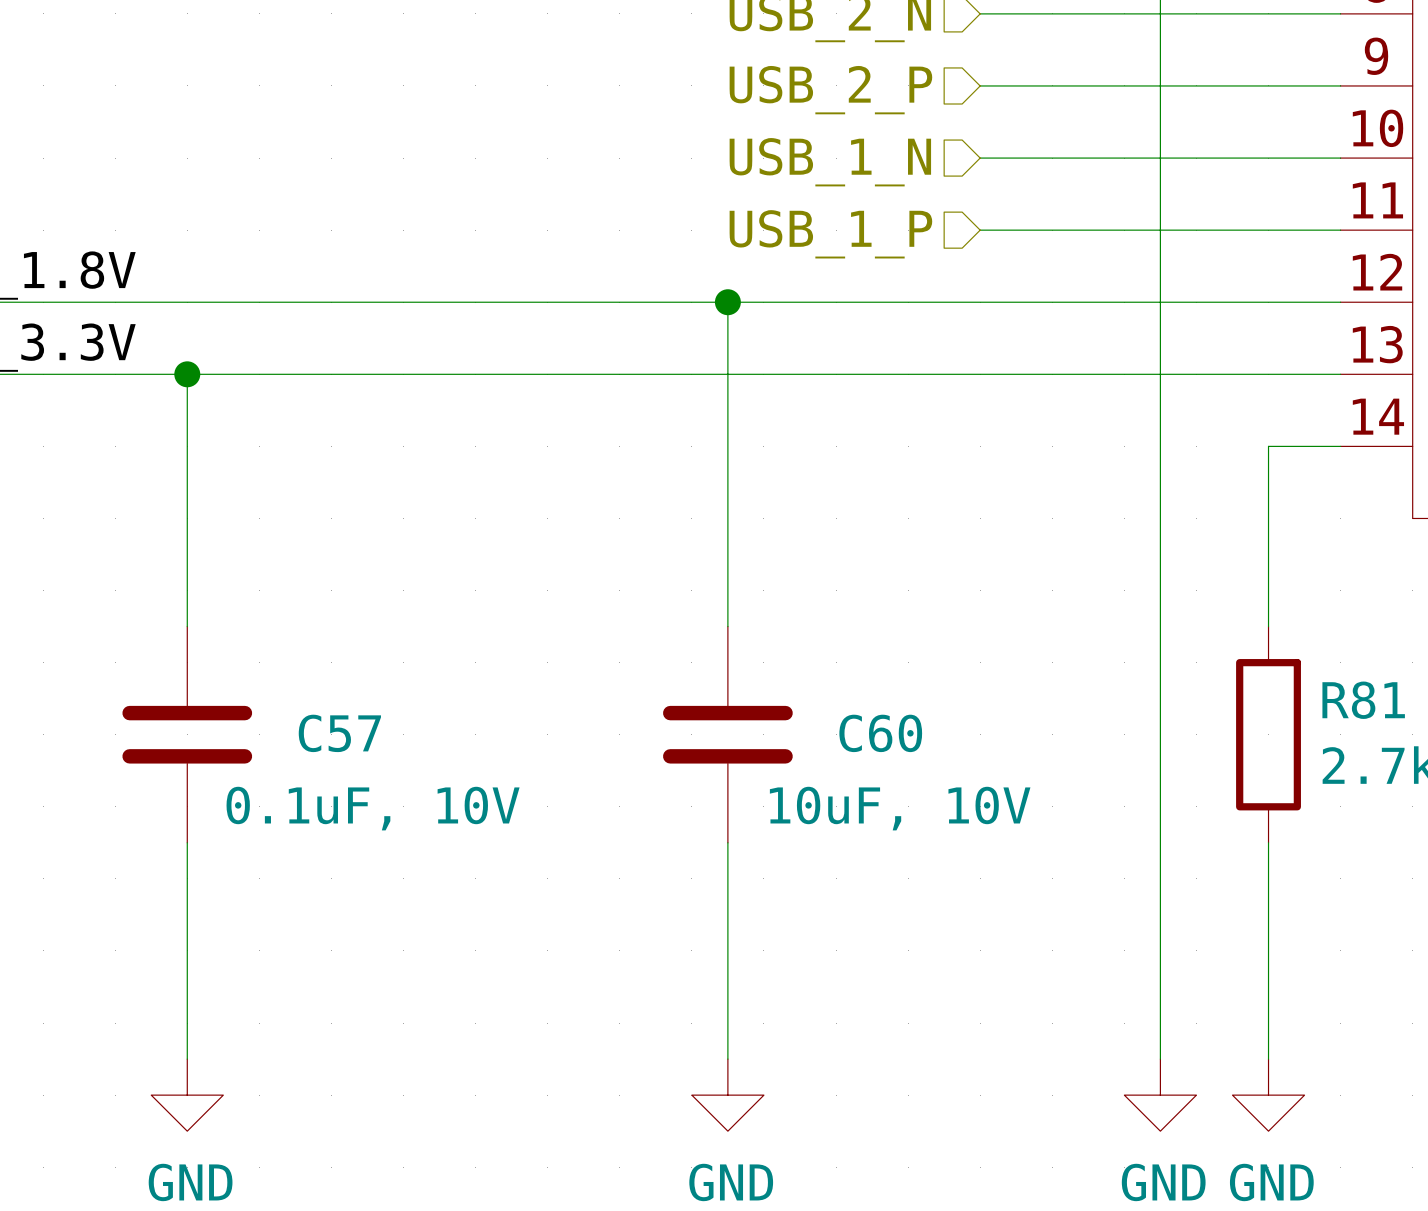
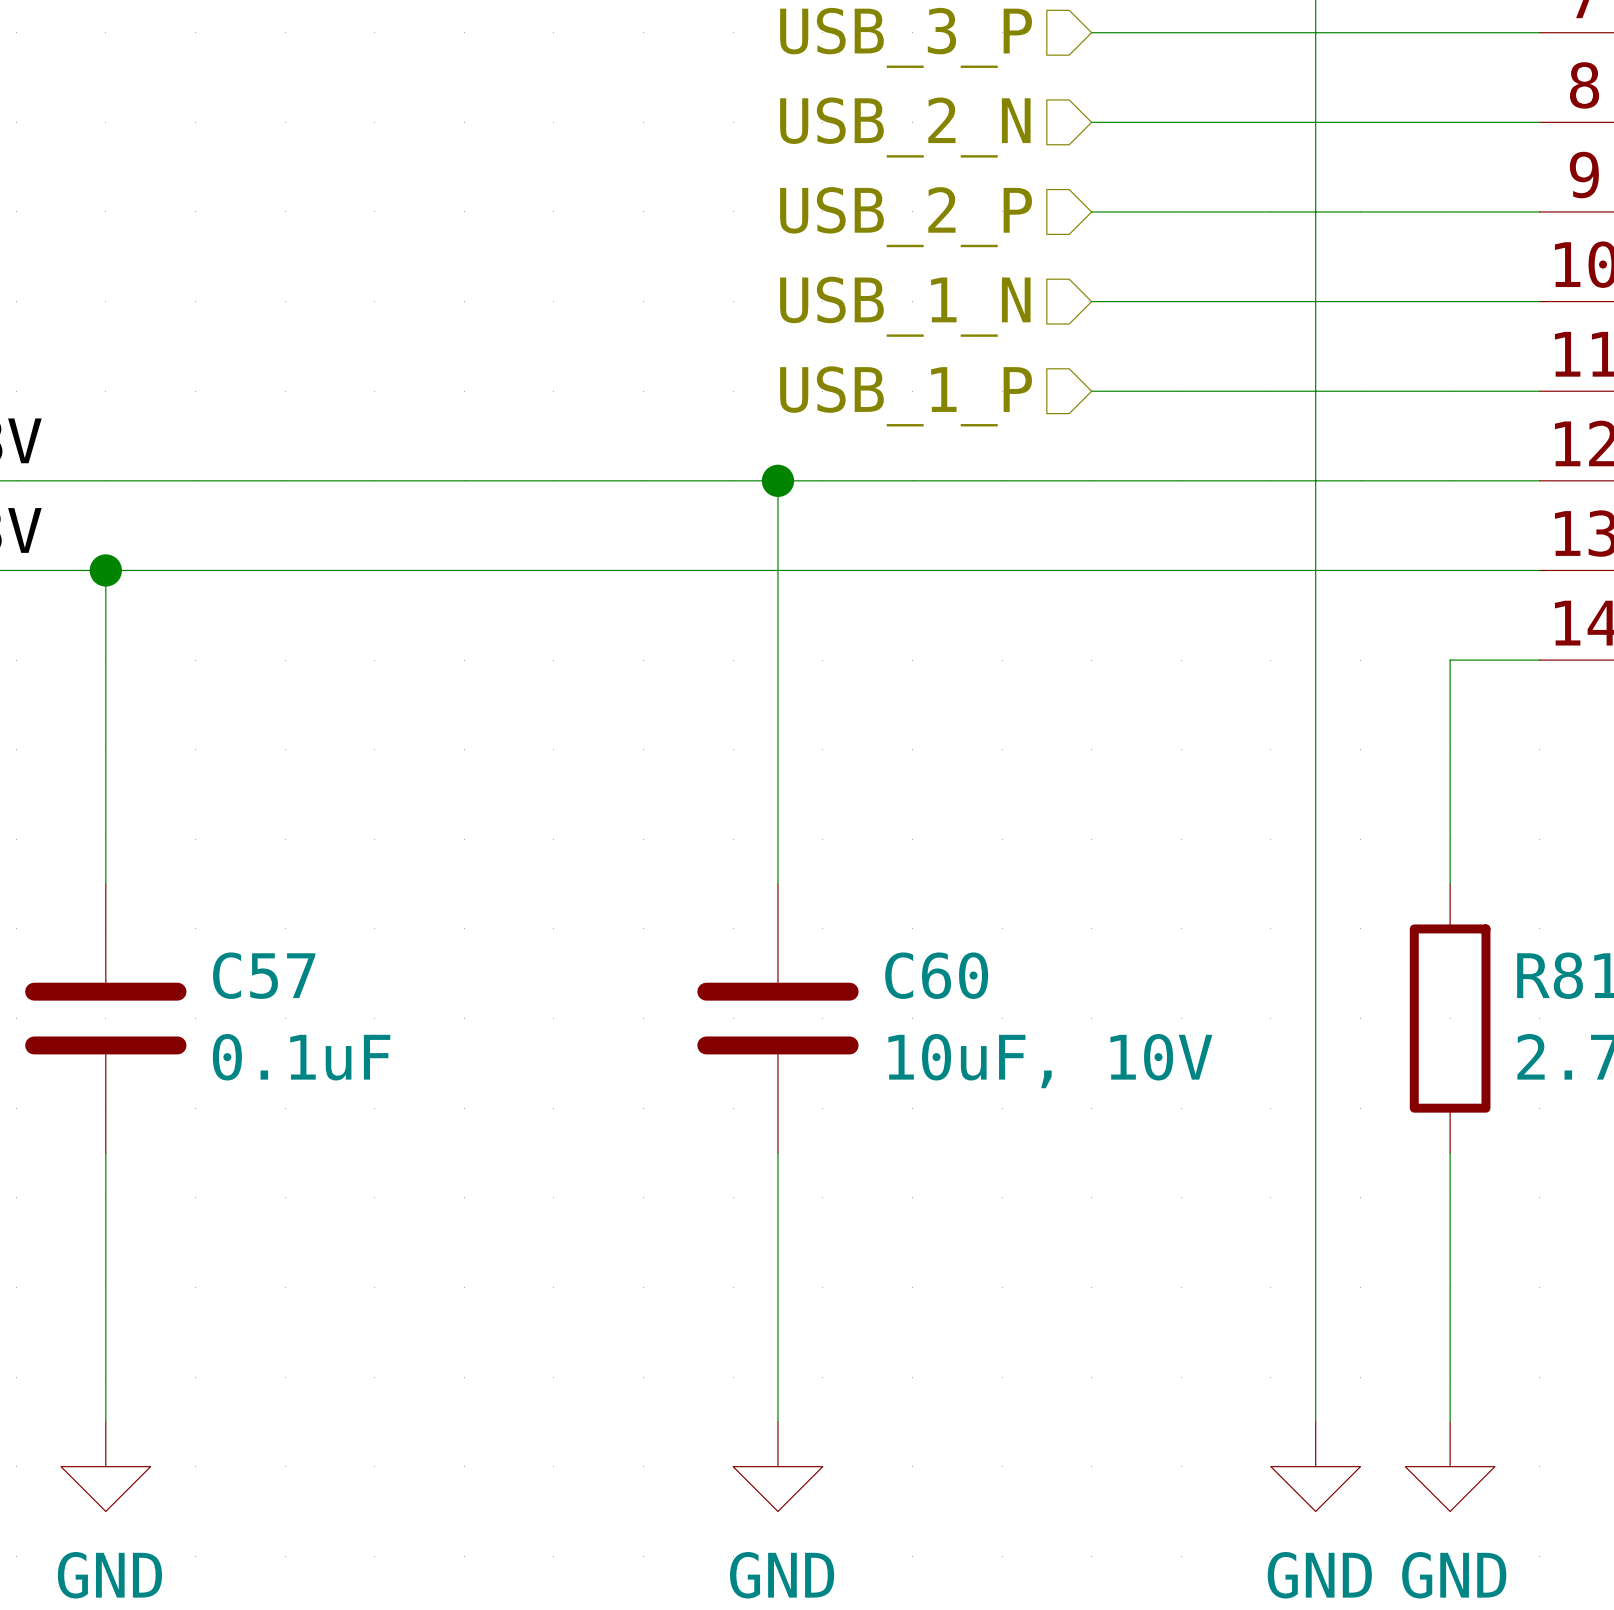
C57 name position: C57 (339, 733) -> C57 (264, 975)
C60 name position: C60 (880, 733) -> C60 (936, 975)
C57 value: 0.1uF, 10V (373, 808) -> 0.1uF (301, 1057)
C60 value position: 10uF, 10V (900, 808) -> 10uF, 10V (1050, 1061)

